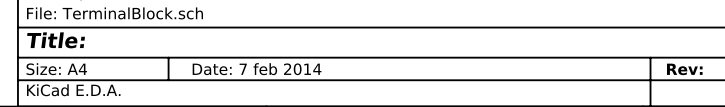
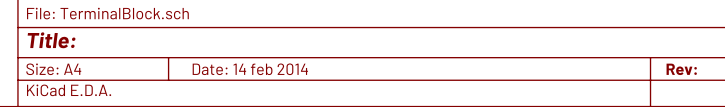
title block: Date: 7 feb 2014 (257, 69) -> Date: 14 feb 2014 (250, 69)

